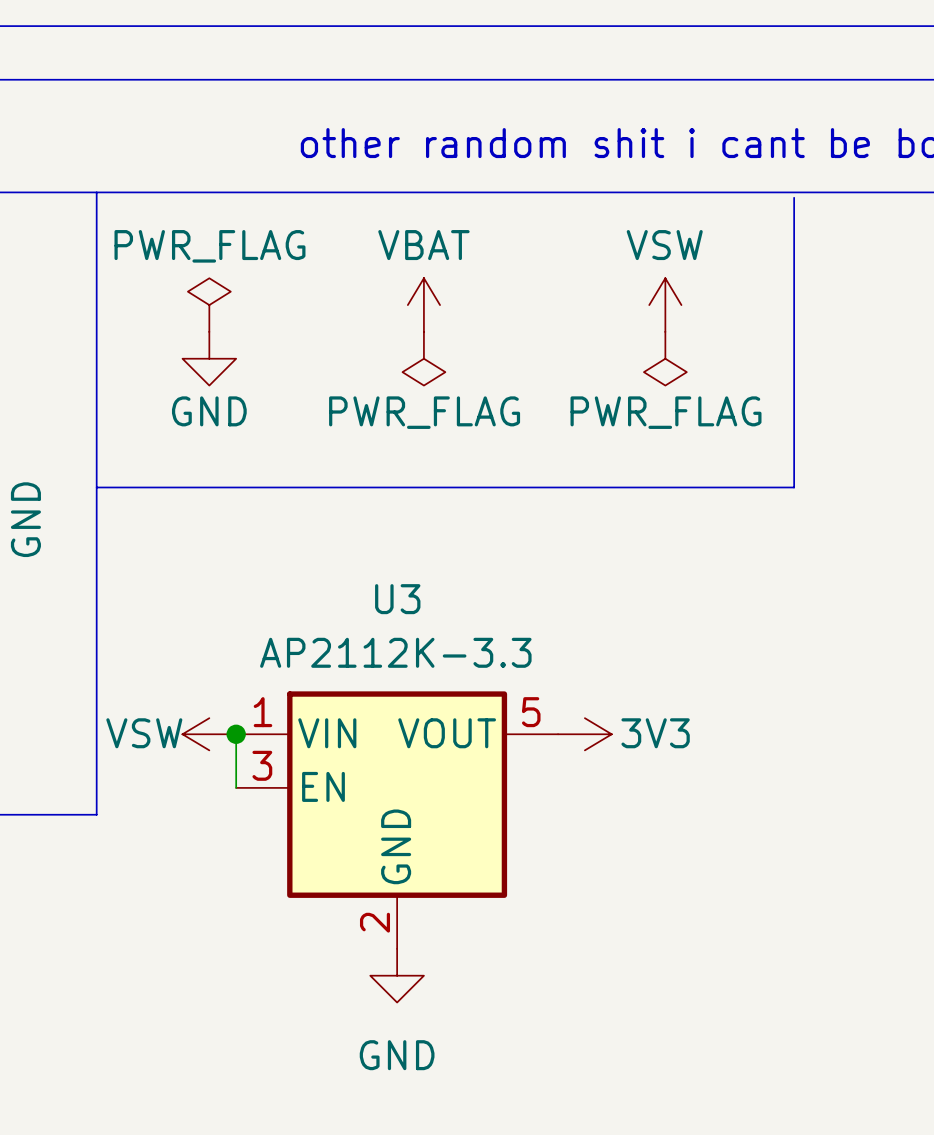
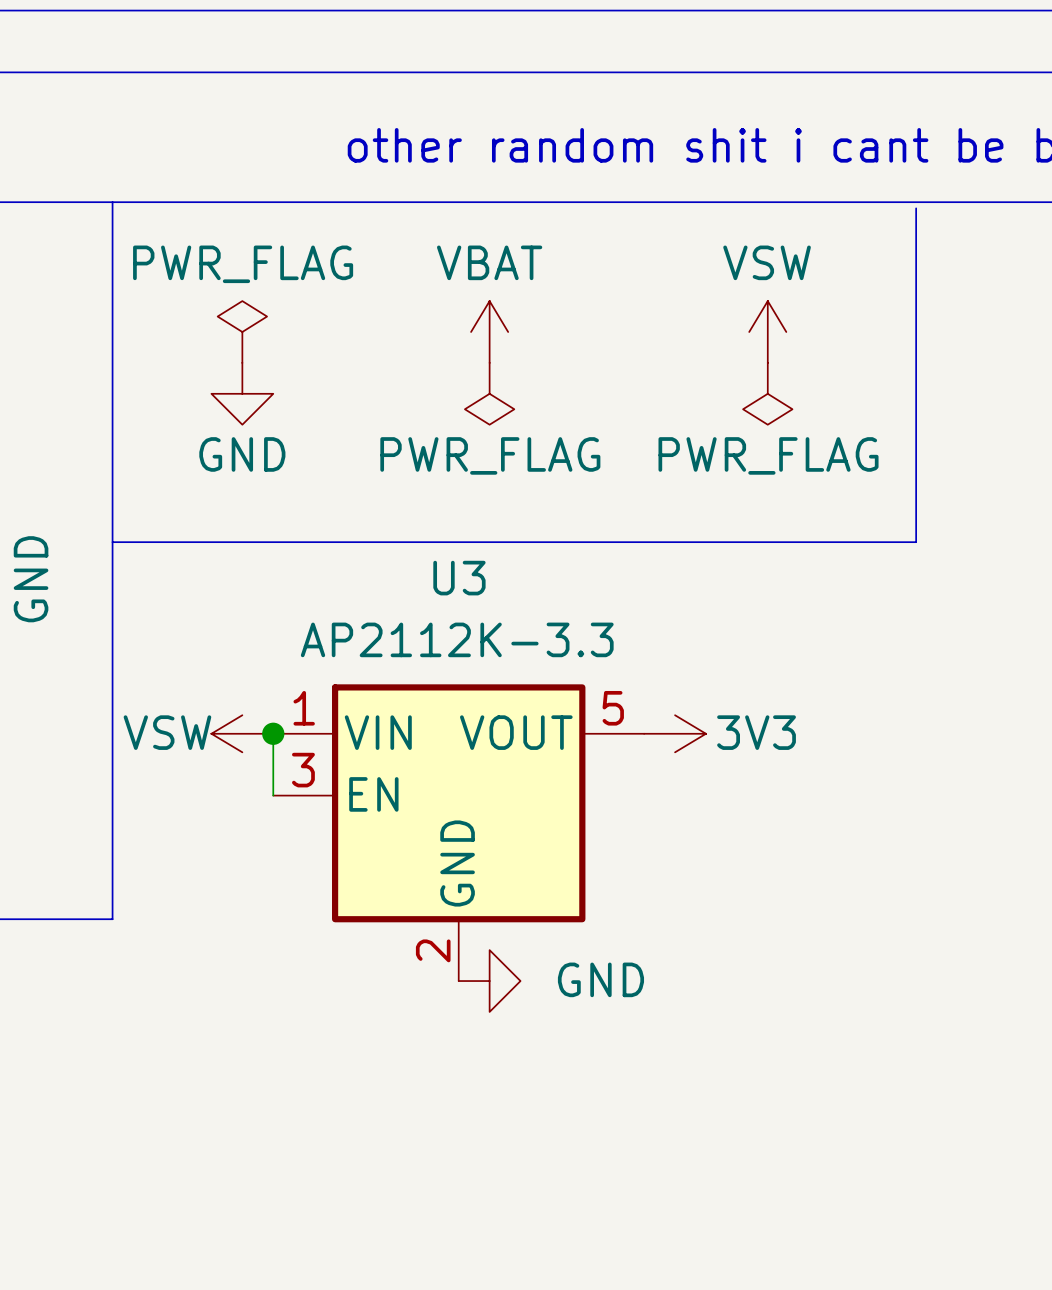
power symbol position: VSW (209, 734) -> VSW (242, 733)
wire: (236, 734) (236, 787) -> (273, 733) (273, 795)
junction position: (236, 734) -> (273, 733)
power symbol position: 3V3 (584, 734) -> 3V3 (675, 733)
U3 position: (397, 820) -> (458, 832)
power symbol rotation: 0° (397, 975) -> 90° counterclockwise (489, 981)
power symbol position: GND (397, 975) -> GND (489, 981)

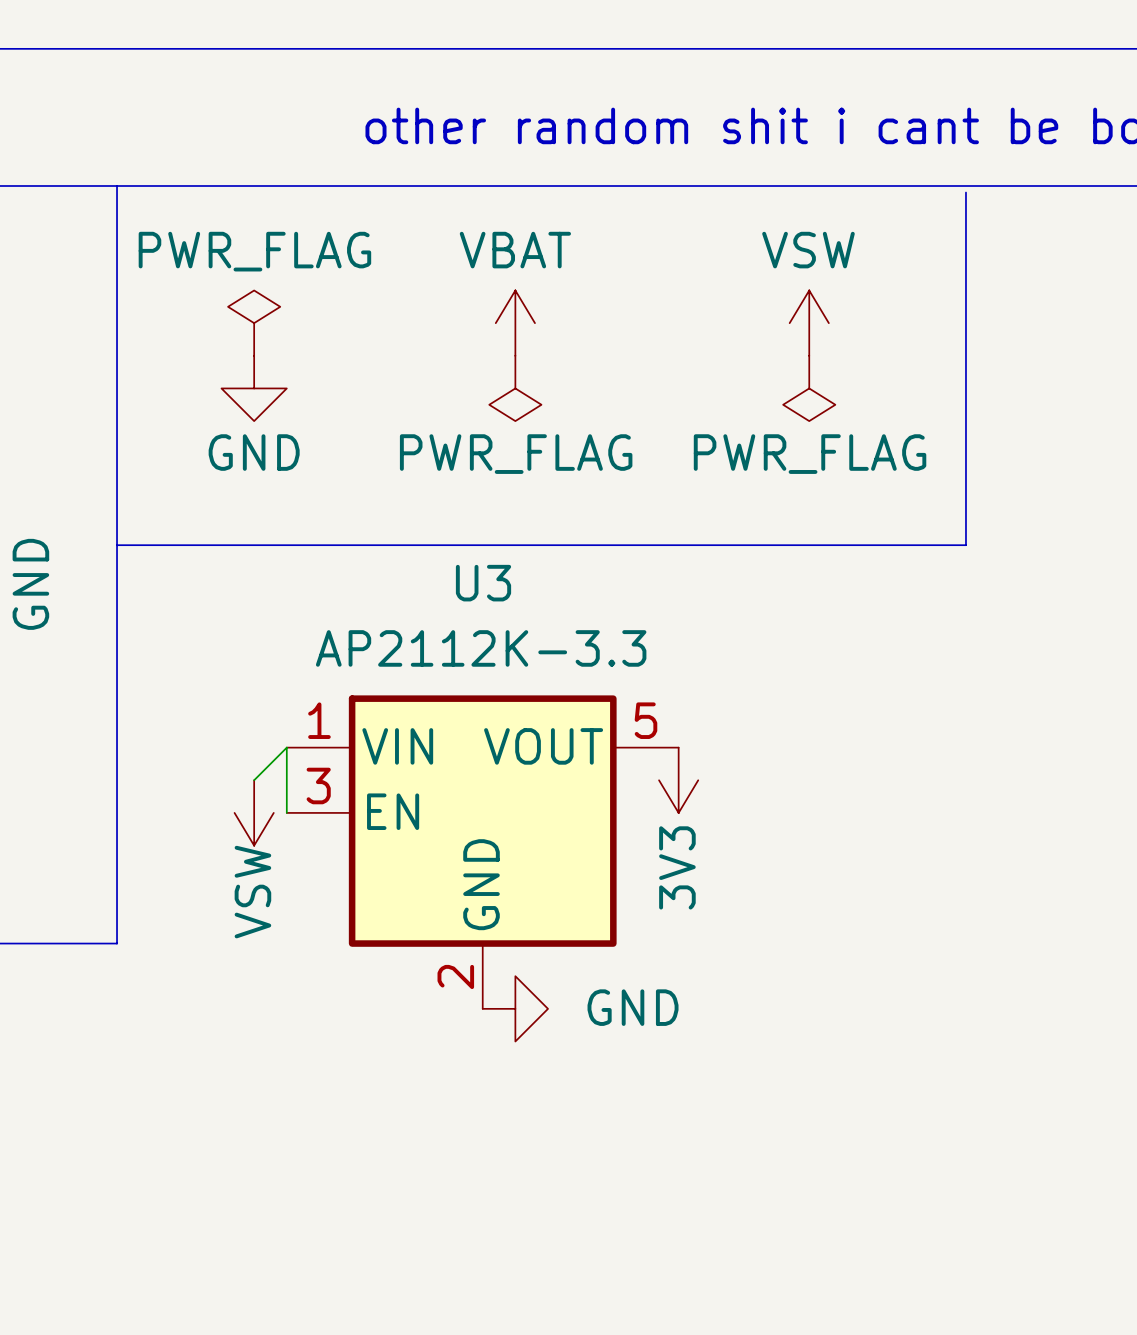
power symbol rotation: 0° (242, 733) -> 90° counterclockwise (254, 812)
power symbol position: VSW (242, 733) -> VSW (254, 812)
wire: none -> (286, 747) (254, 780)
junction: (273, 733) -> none
power symbol rotation: 0° (675, 733) -> 90° clockwise (678, 780)
power symbol position: 3V3 (675, 733) -> 3V3 (678, 780)

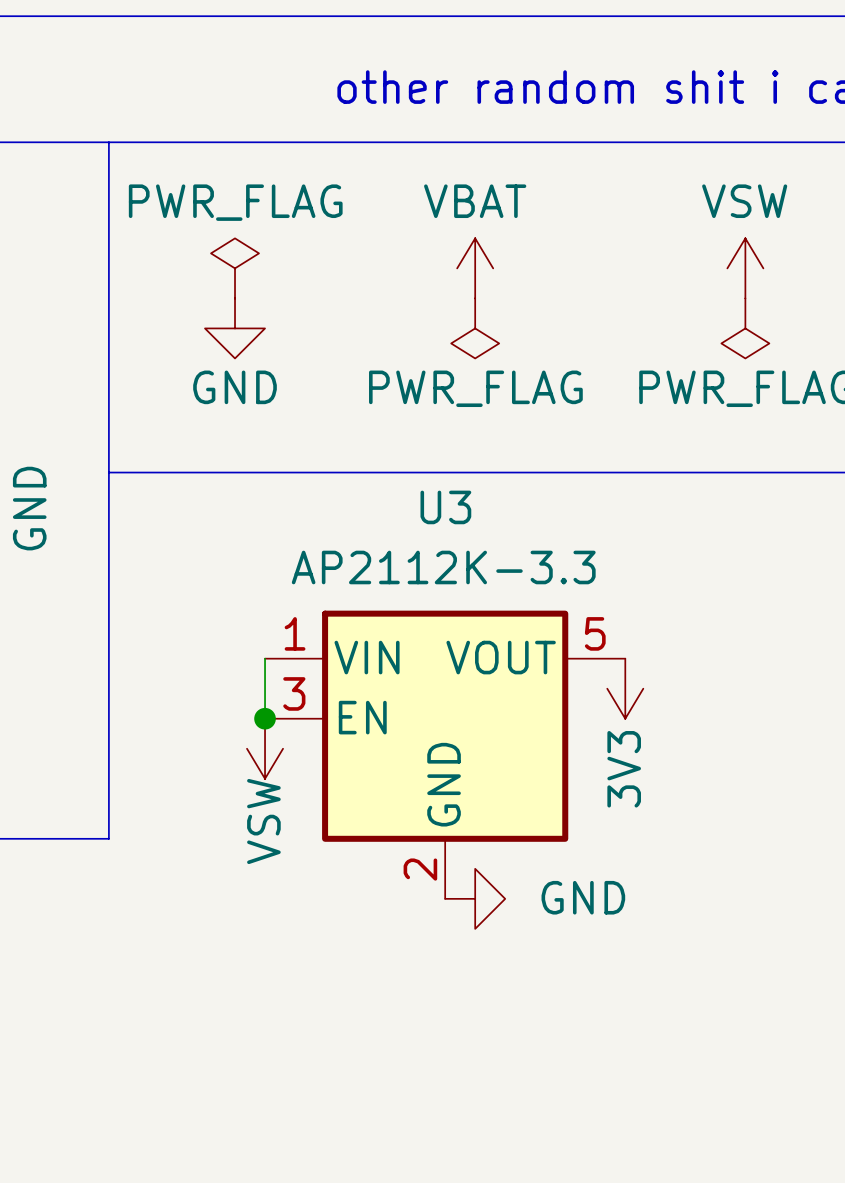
wire: (286, 747) (254, 780) -> none
power symbol position: VSW (254, 812) -> VSW (265, 748)
junction: none -> (265, 718)

